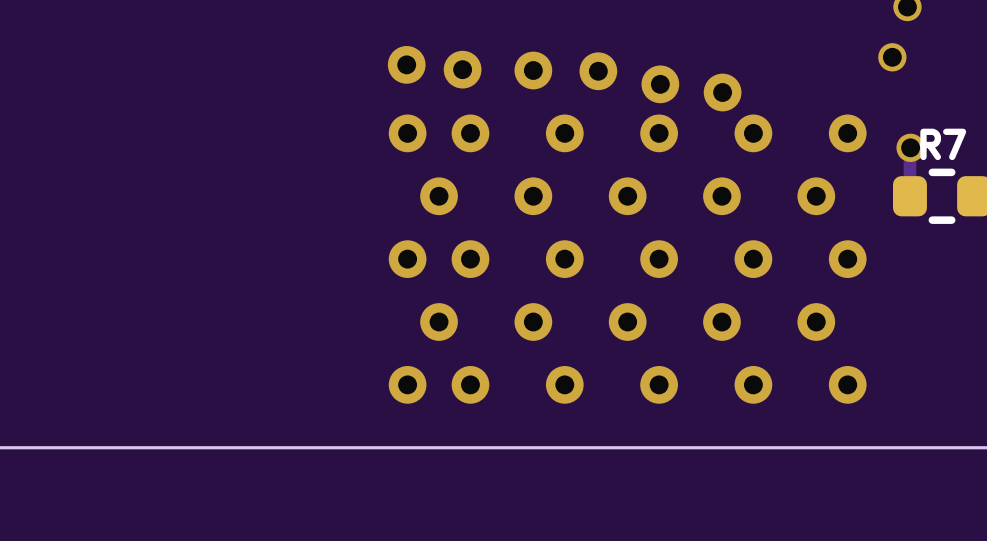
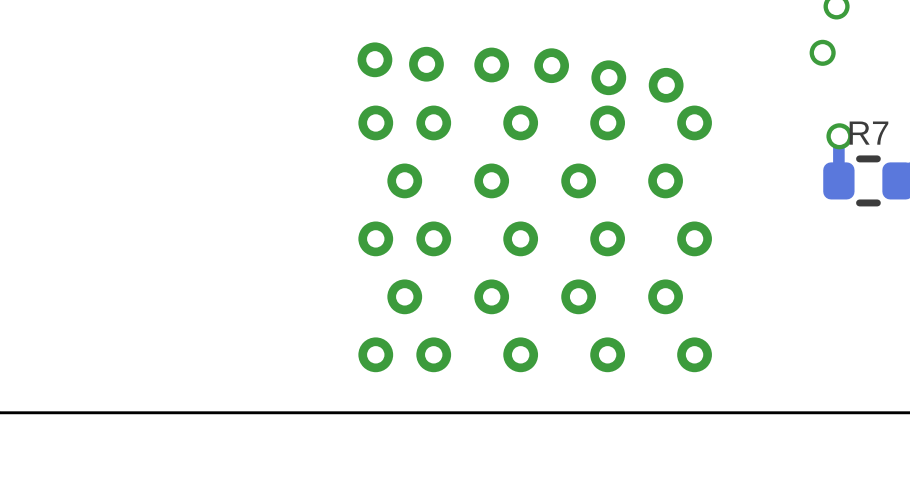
via: (847, 133) -> none
via: (816, 196) -> none
via: (847, 259) -> none
via: (816, 322) -> none
via: (847, 384) -> none

